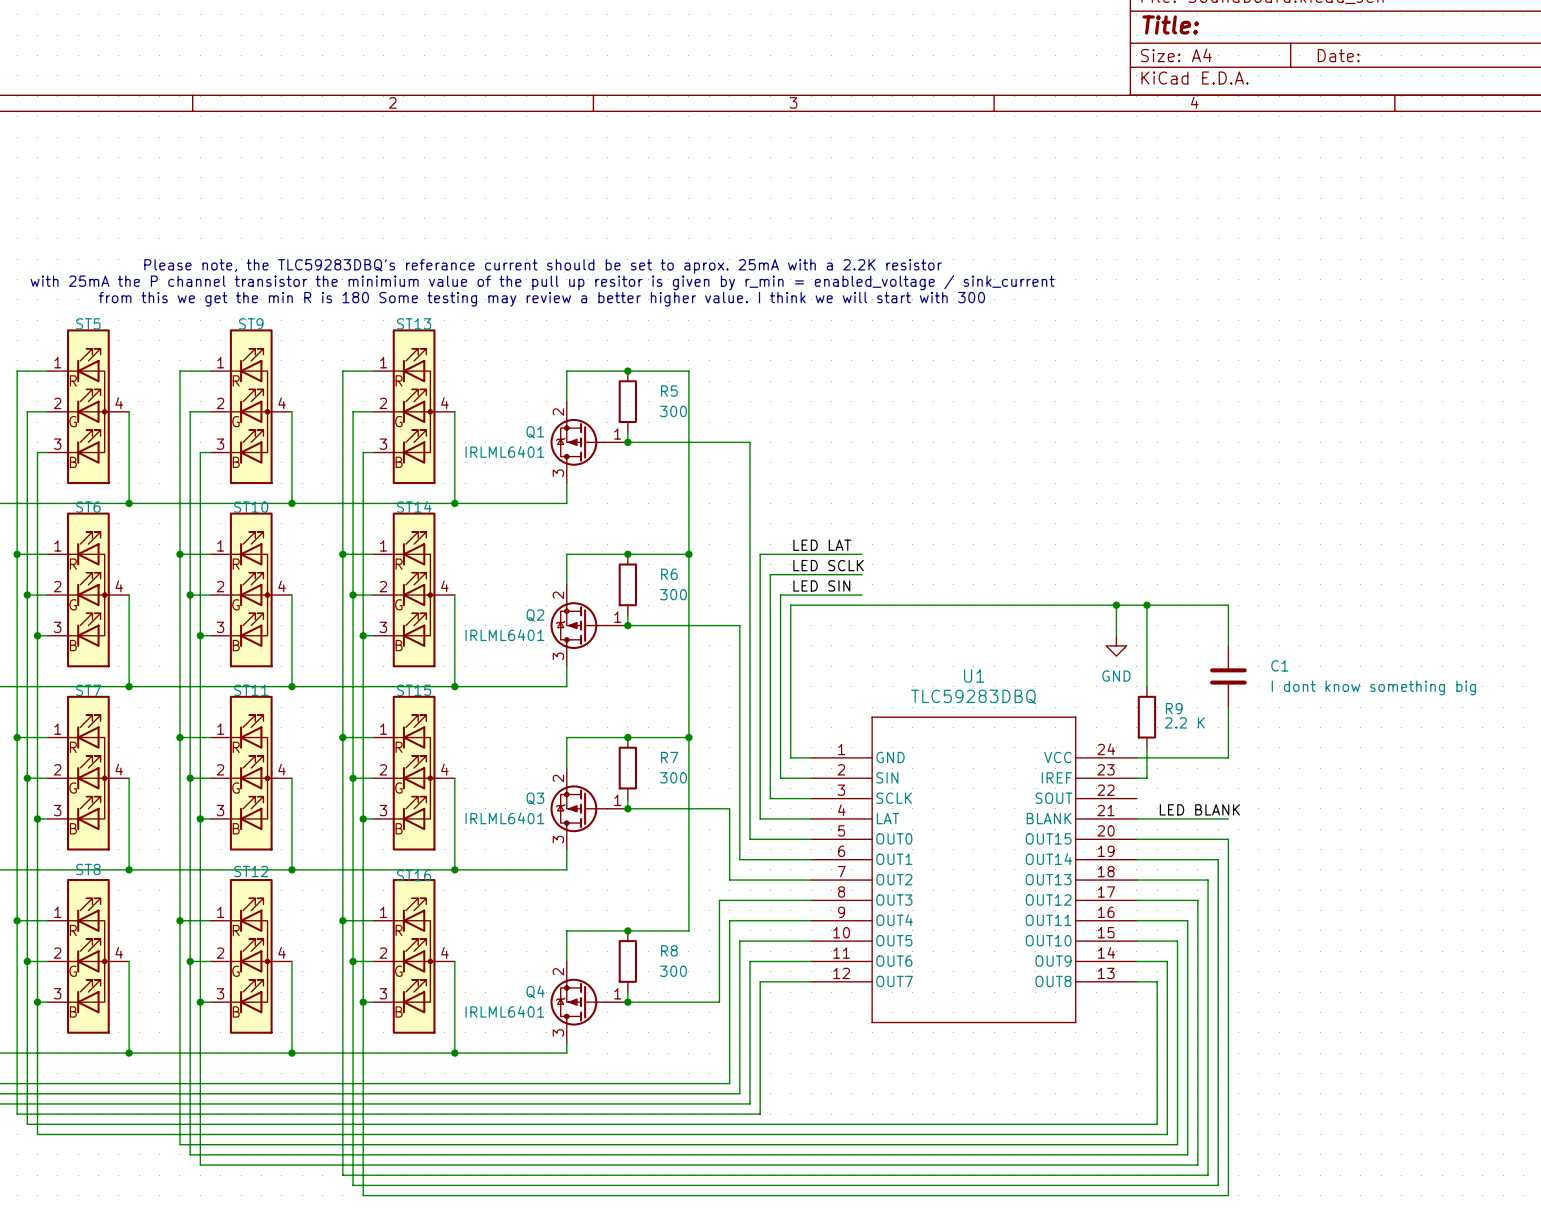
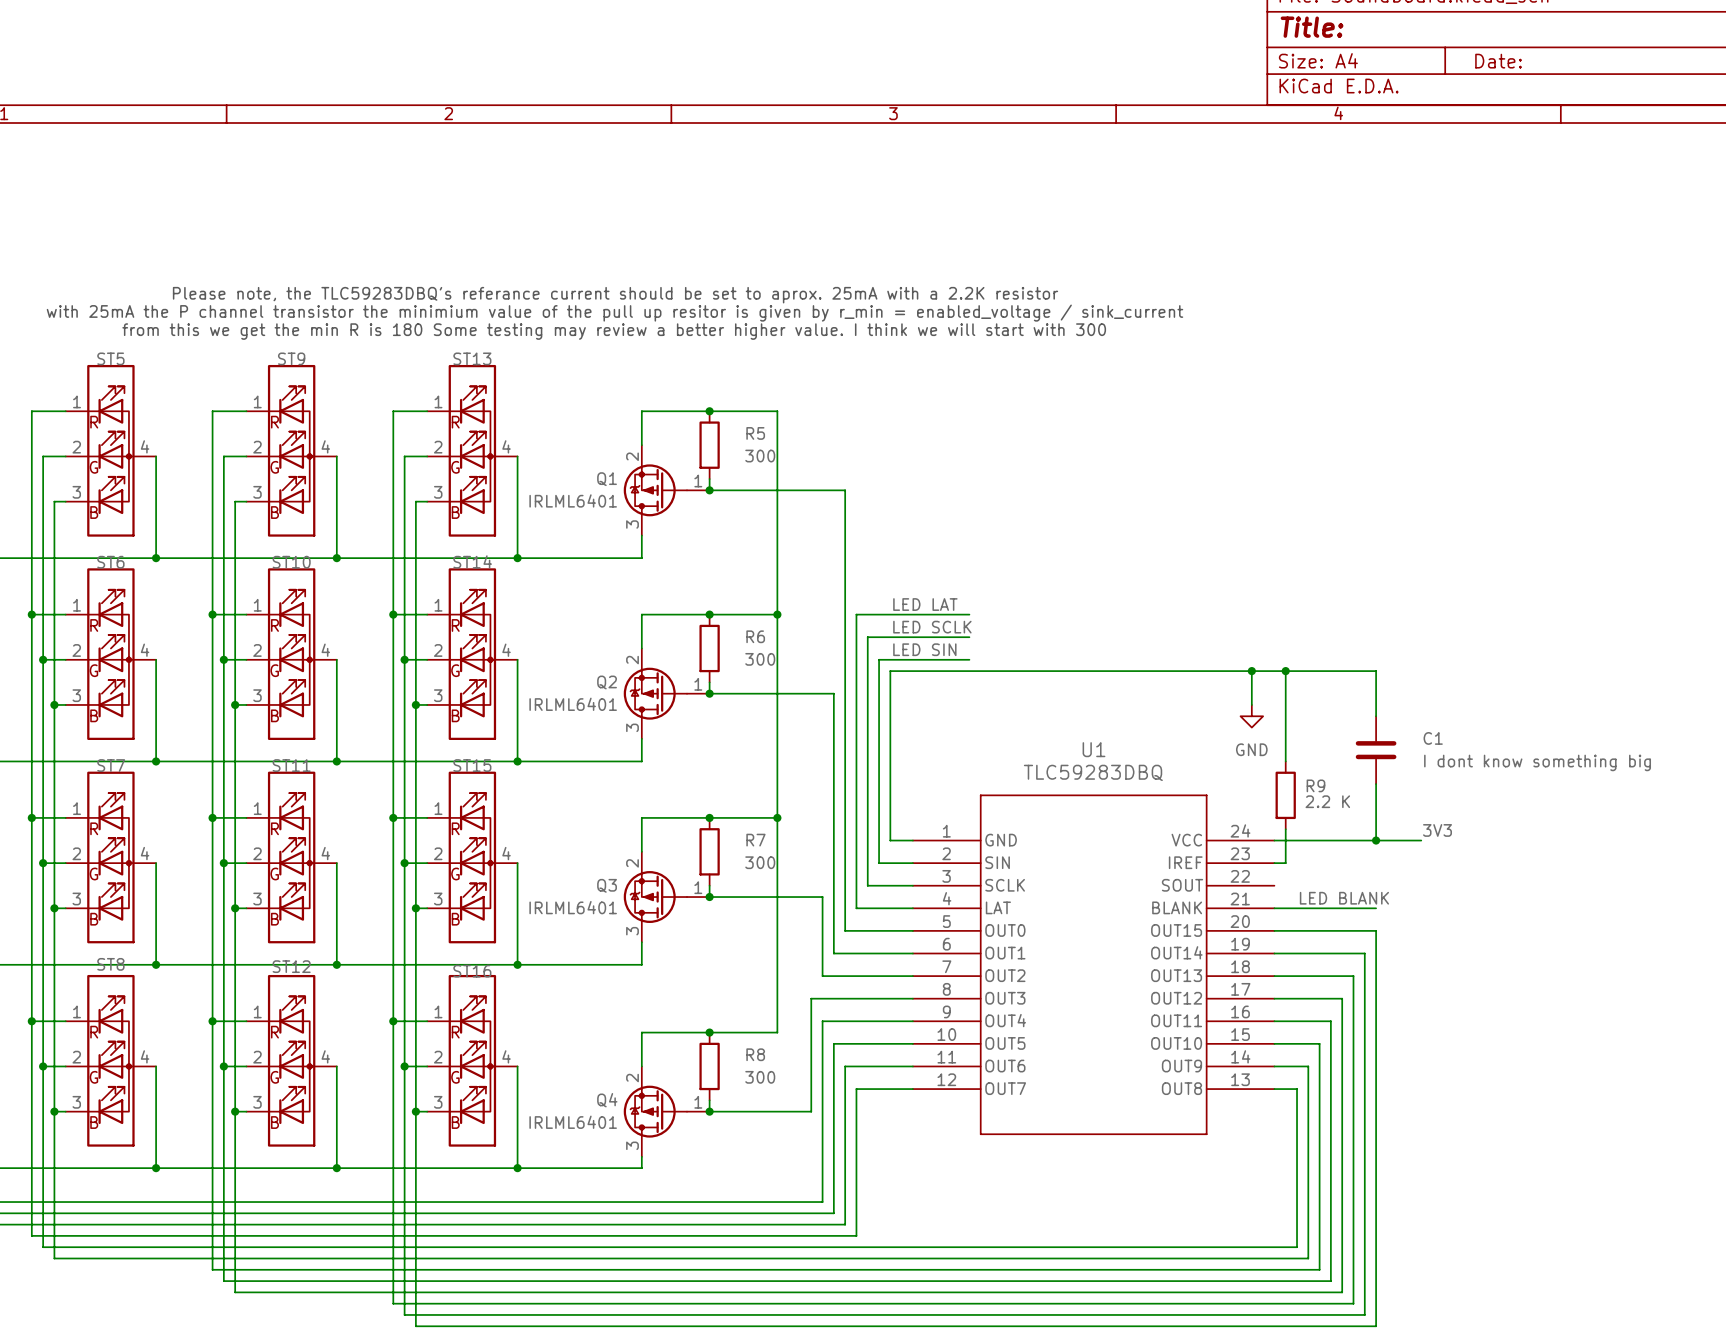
label: none -> 3V3 (1437, 830)
wire: none -> (1376, 840) (1421, 840)
junction: none -> (1376, 840)

